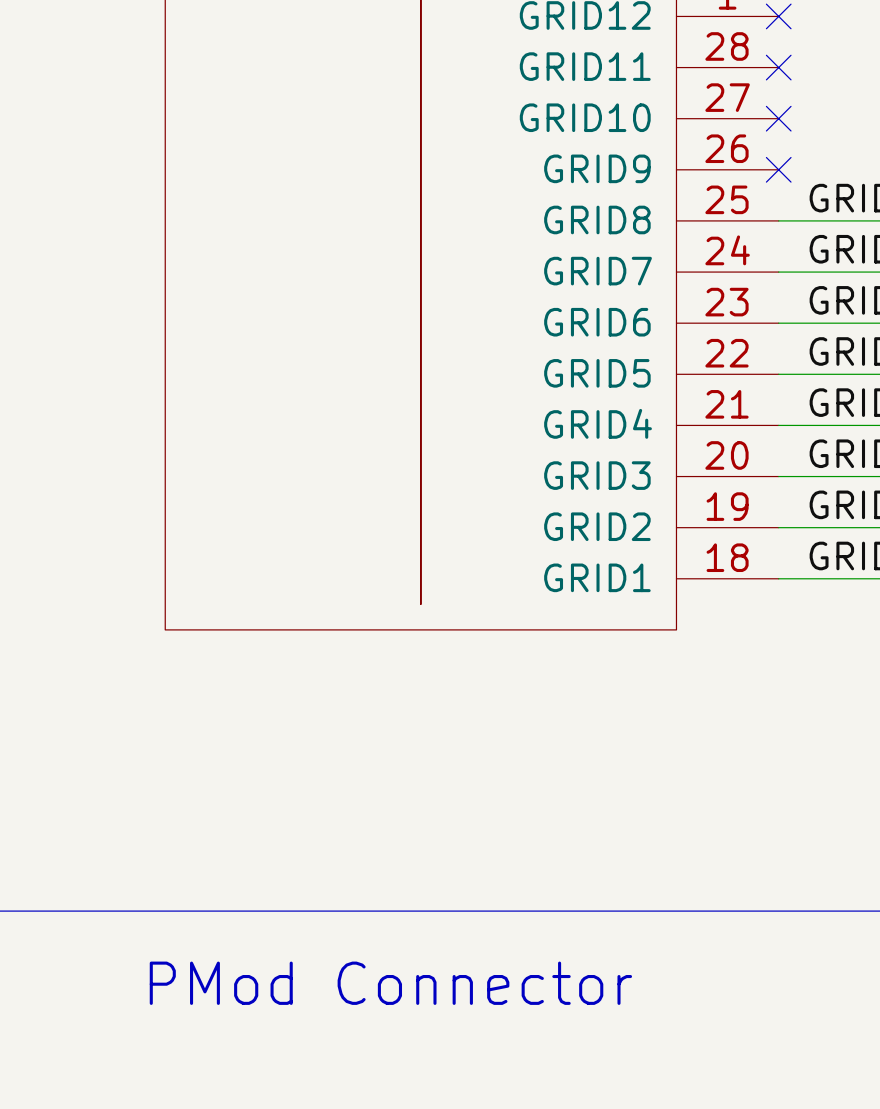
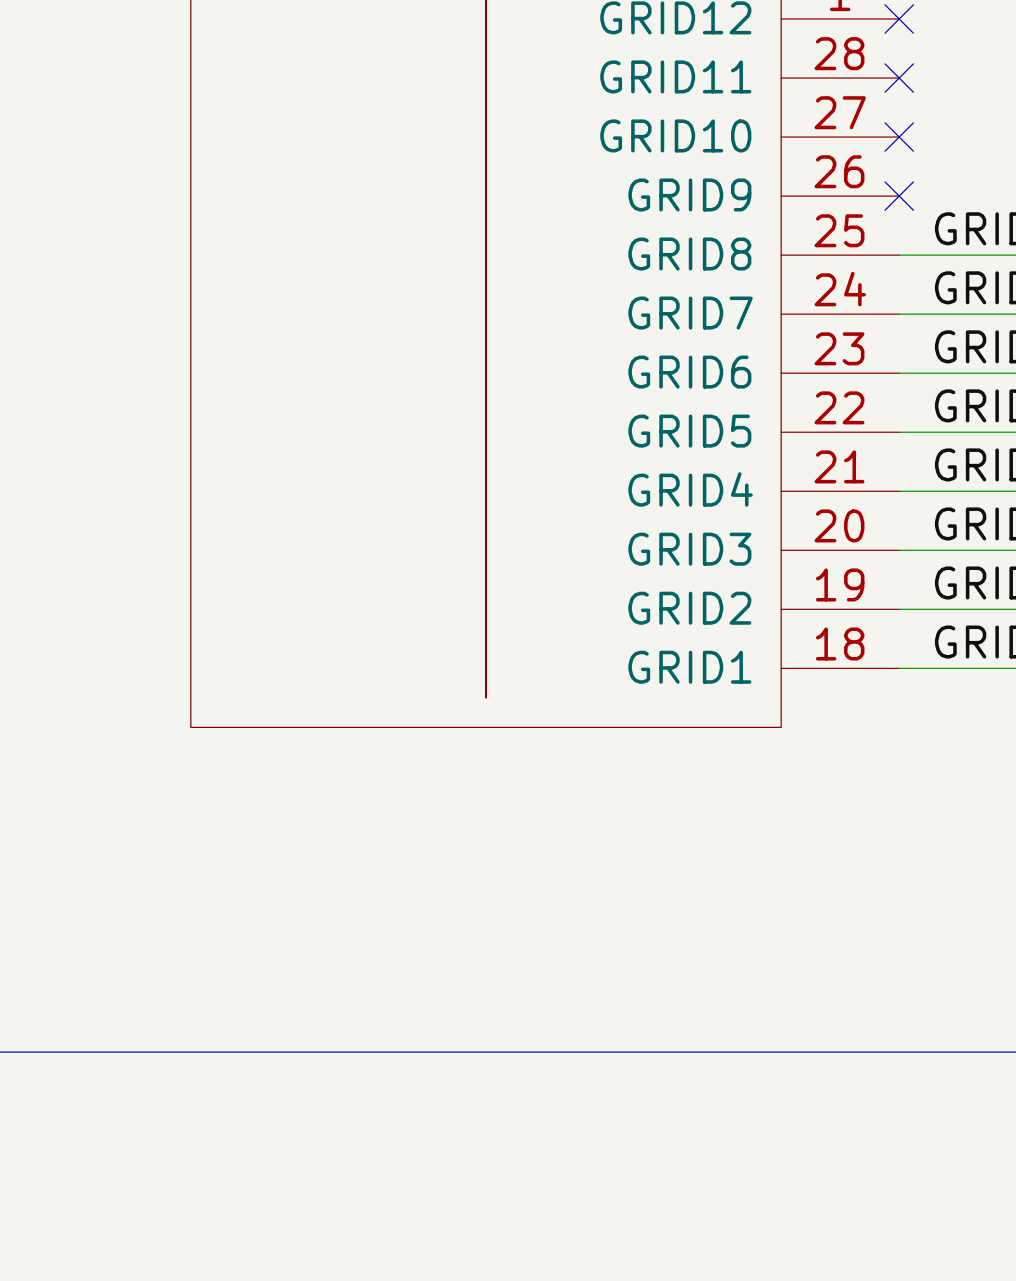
text: PMod Connector (390, 983) -> none

